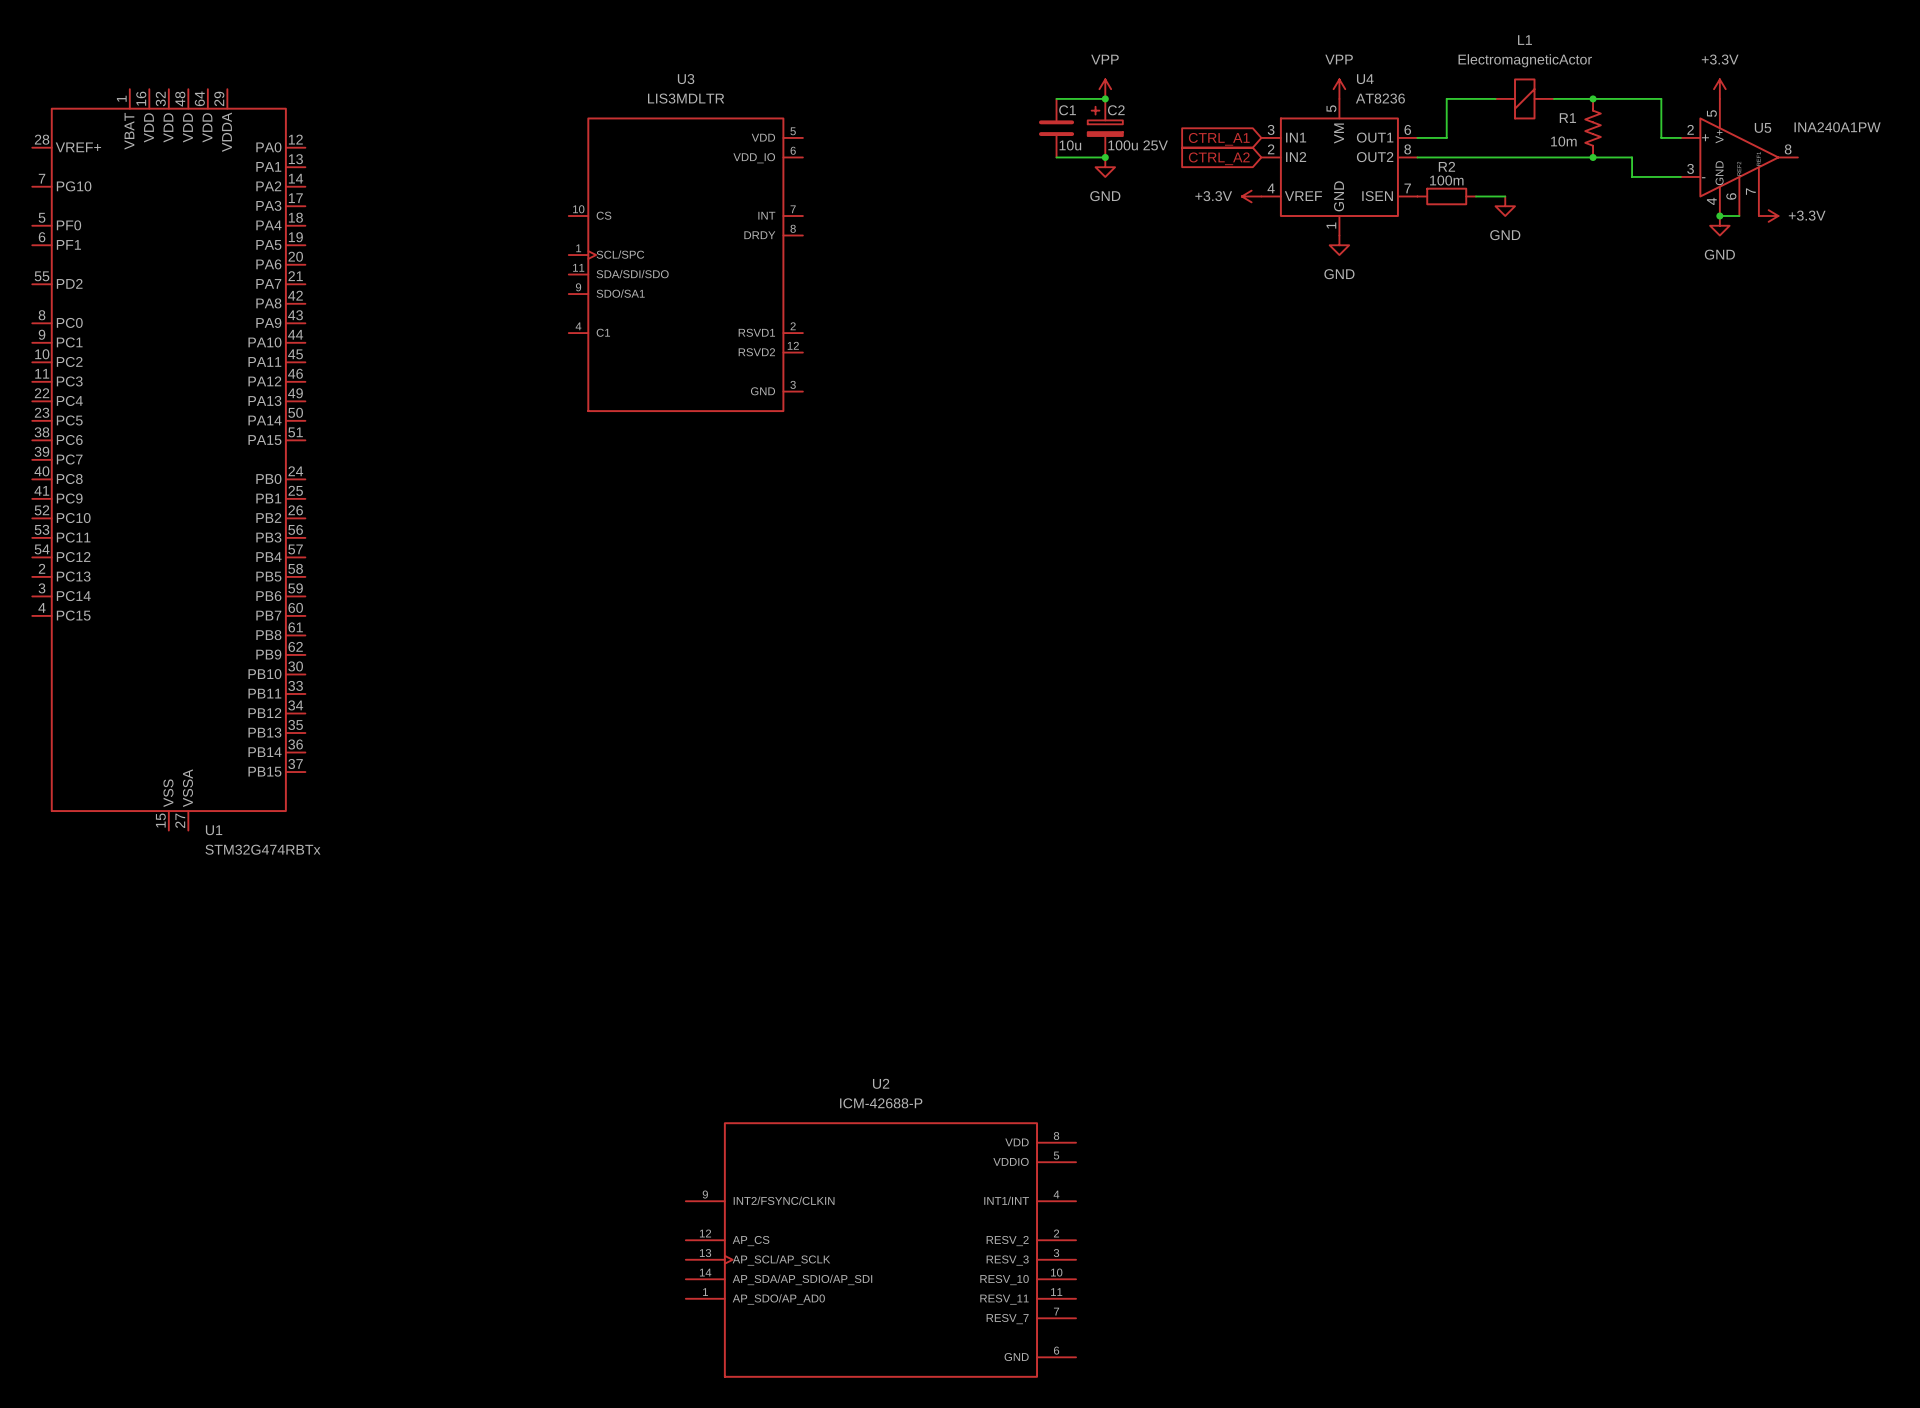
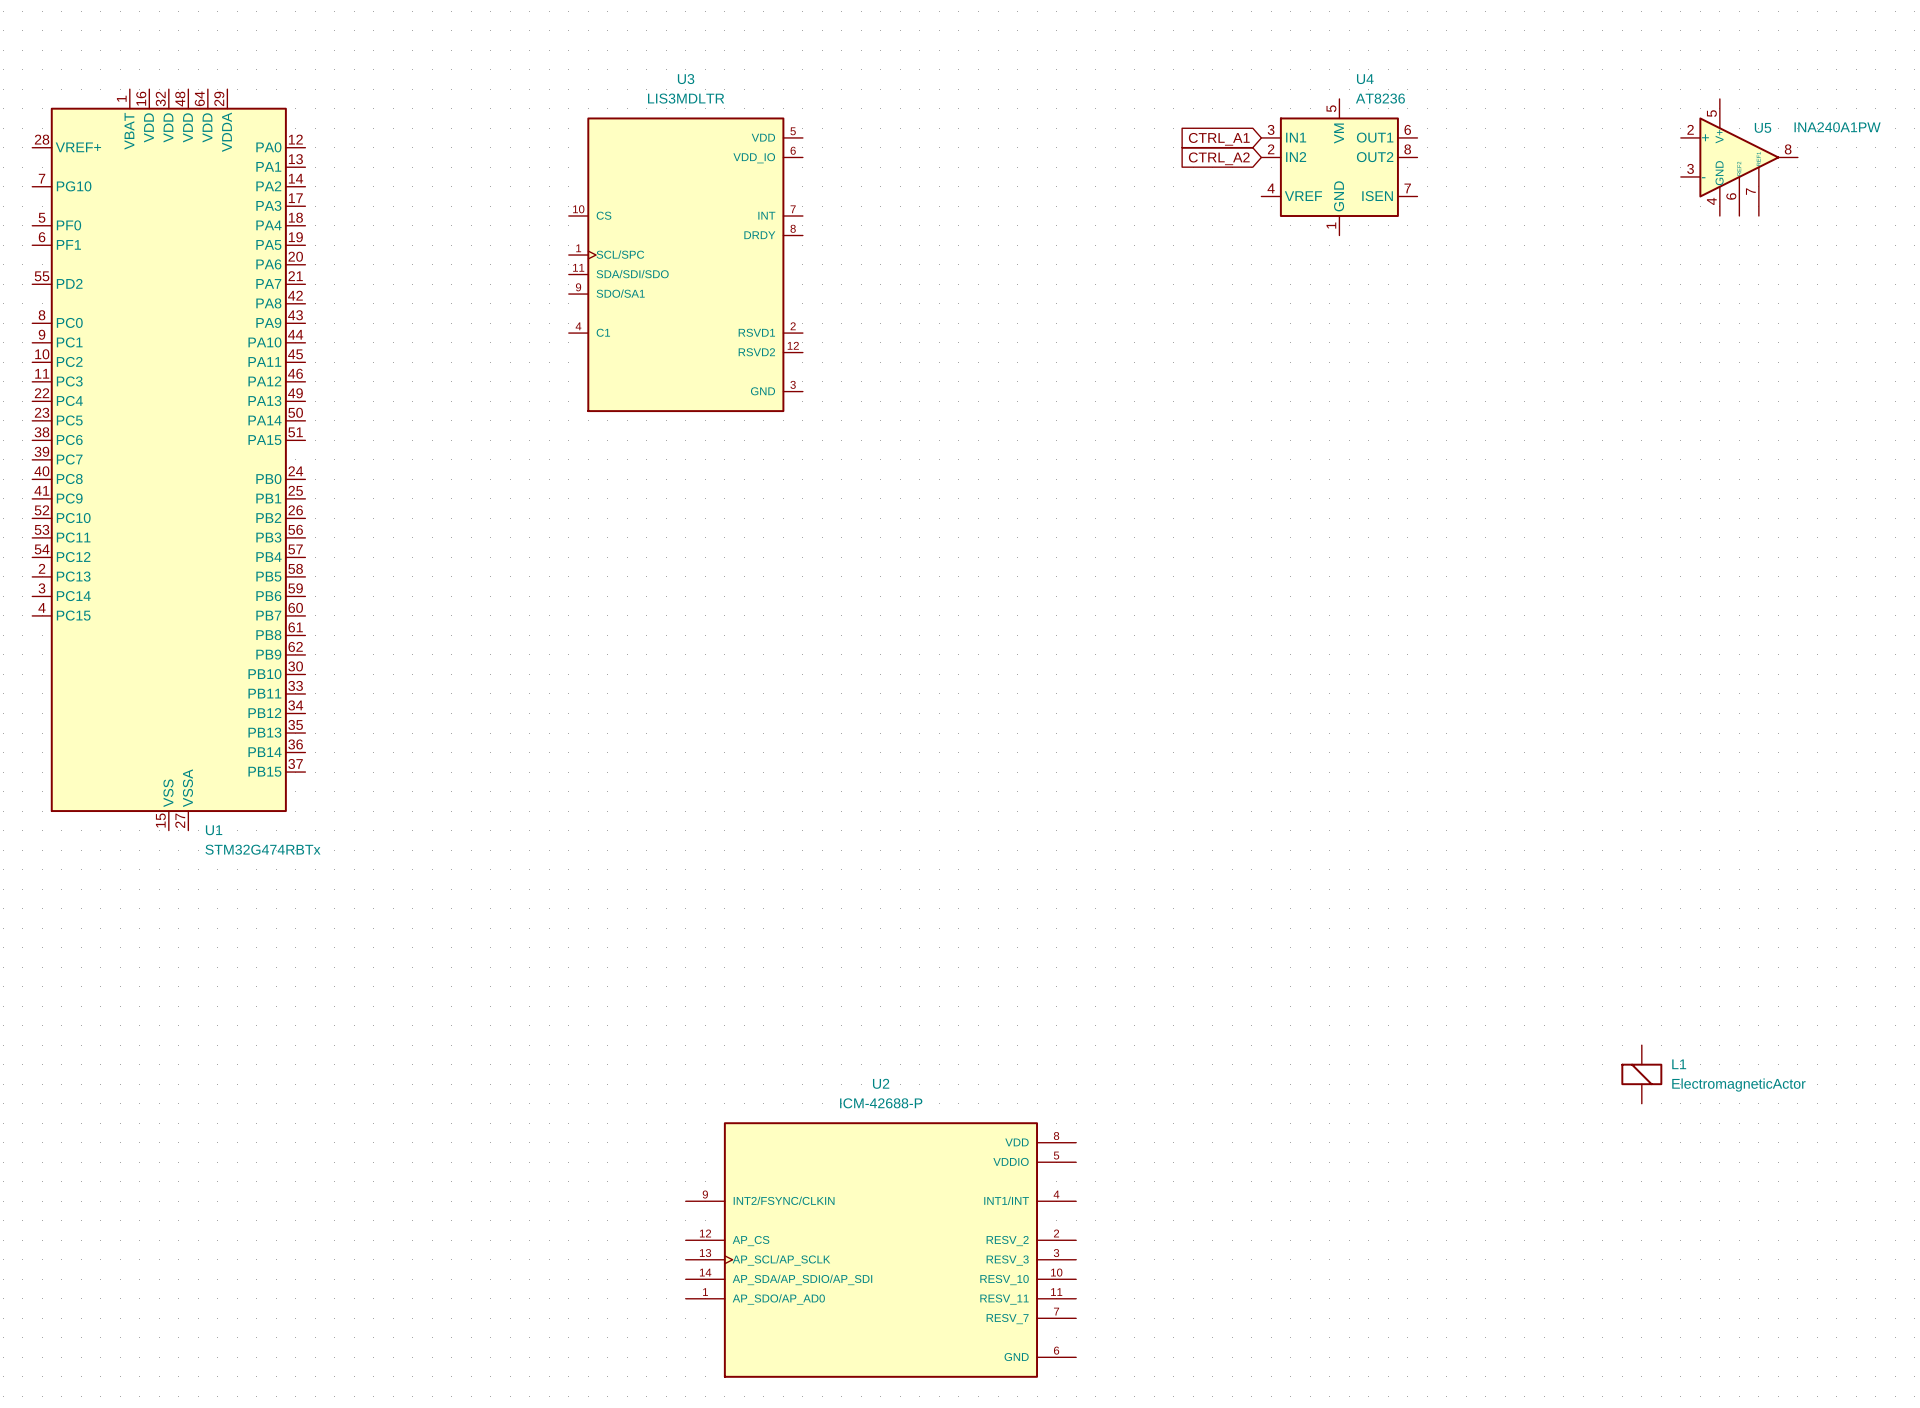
L1 name position: L1 (1525, 40) -> L1 (1679, 1064)
L1 value position: ElectromagneticActor (1525, 60) -> ElectromagneticActor (1738, 1085)
power symbol: VPP (1105, 89) -> none
power symbol: VPP (1339, 89) -> none
power symbol: +3.3V (1719, 89) -> none
wire: (1056, 98) (1105, 98) -> none
junction: (1105, 98) -> none
wire: (1495, 98) (1446, 98) (1446, 137) (1417, 137) -> none
L1 rotation: 0° (1524, 98) -> 90° clockwise (1641, 1074)
L1 position: (1524, 98) -> (1641, 1074)
wire: (1554, 98) (1661, 98) (1661, 137) (1680, 137) -> none
junction: (1593, 98) -> none
C1: 10u (1056, 128) -> none
C2: 100u 25V (1105, 128) -> none
R1: 10m (1593, 128) -> none
wire: (1056, 157) (1105, 157) -> none
junction: (1105, 157) -> none
wire: (1417, 157) (1632, 157) (1632, 176) (1680, 176) -> none
junction: (1593, 157) -> none
power symbol: GND (1105, 167) -> none
power symbol: +3.3V (1251, 196) -> none
R2: 100m (1446, 196) -> none
wire: (1475, 196) (1505, 196) -> none
power symbol: GND (1505, 206) -> none
wire: (1719, 216) (1739, 216) -> none
junction: (1719, 216) -> none
power symbol: +3.3V (1768, 216) -> none
power symbol: GND (1719, 225) -> none
power symbol: GND (1339, 245) -> none

